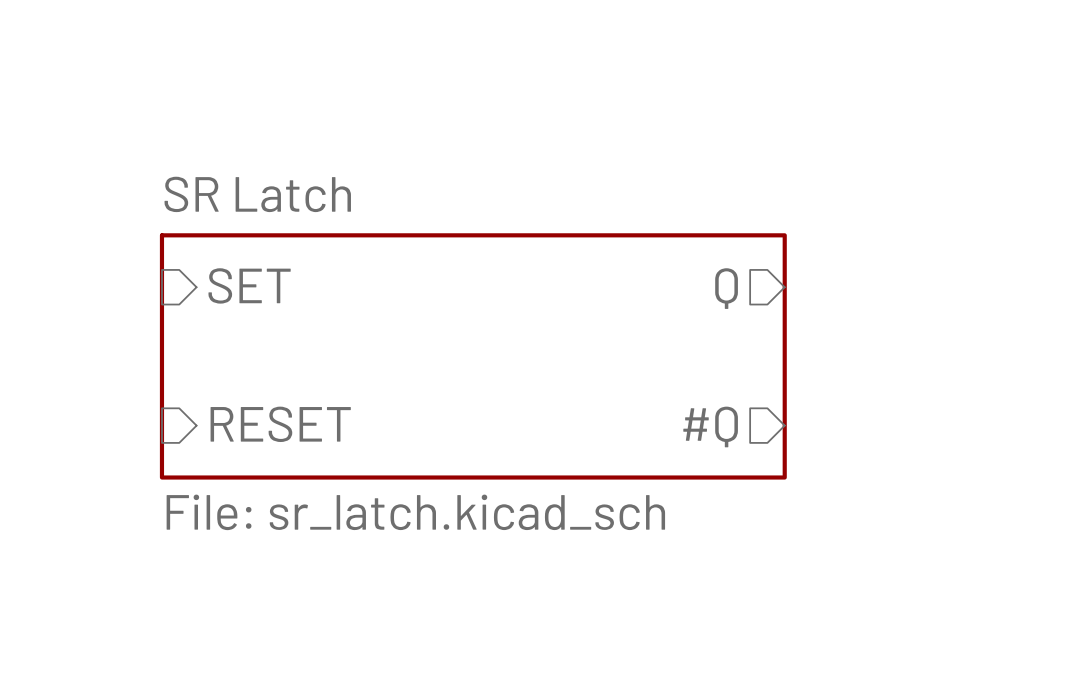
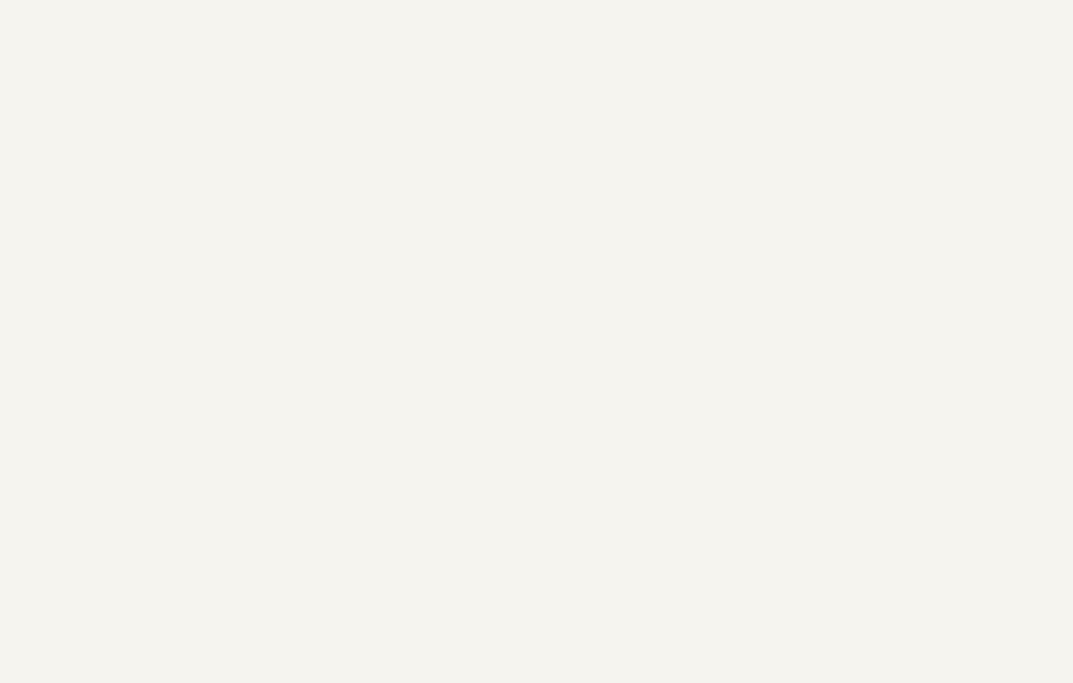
sheet pin: SET (249, 285) -> none
sheet pin: Q (726, 288) -> none
sheet SR Latch: File: sr_latch.kicad_sch (473, 356) -> none
sheet pin: RESET (280, 424) -> none
sheet pin: #Q (710, 426) -> none

